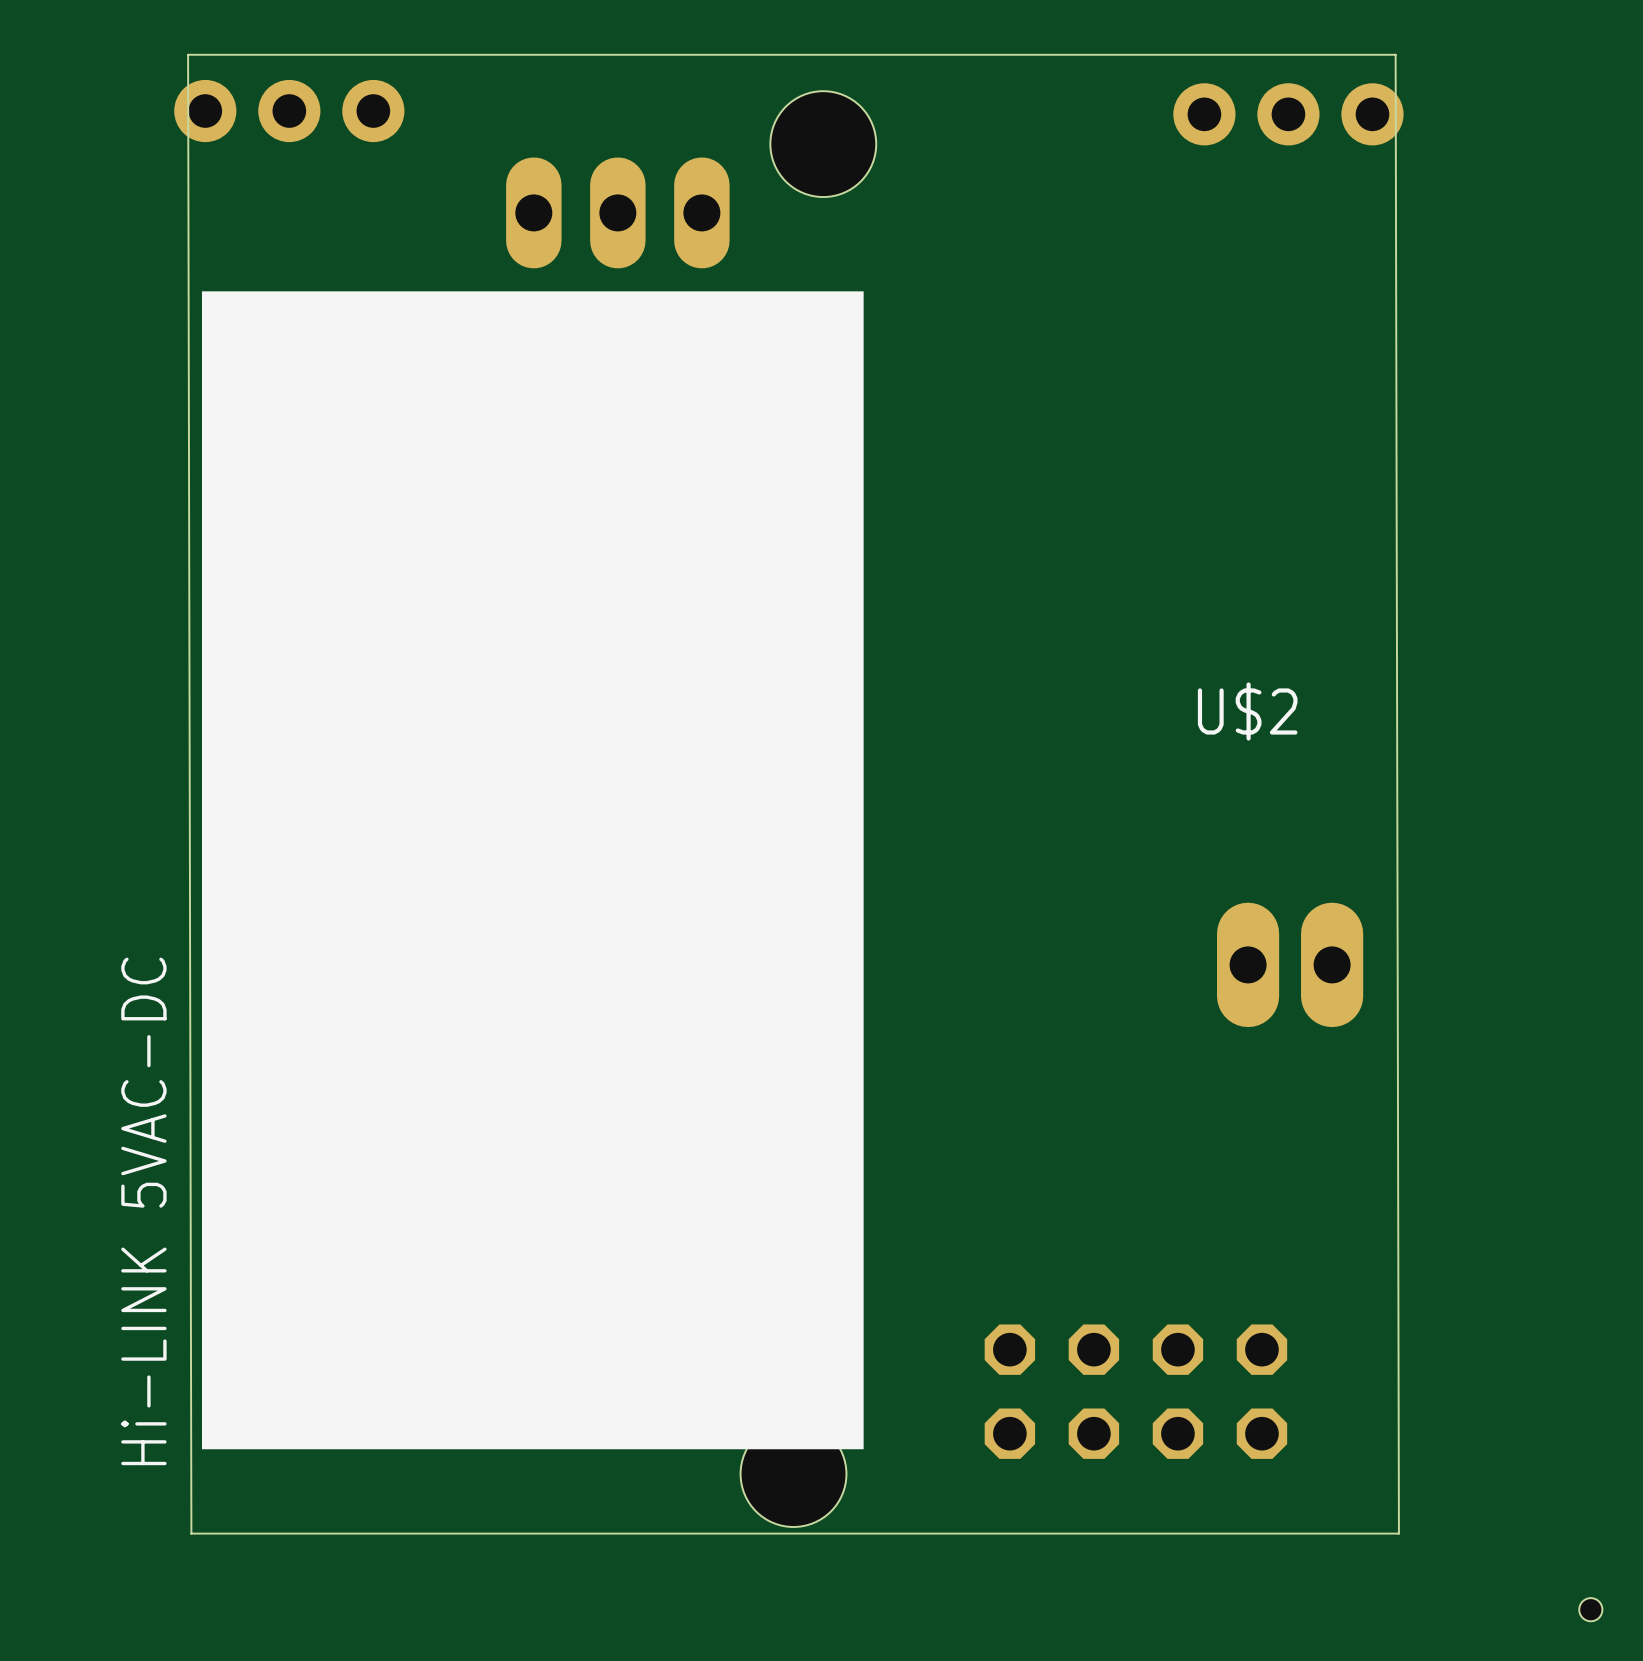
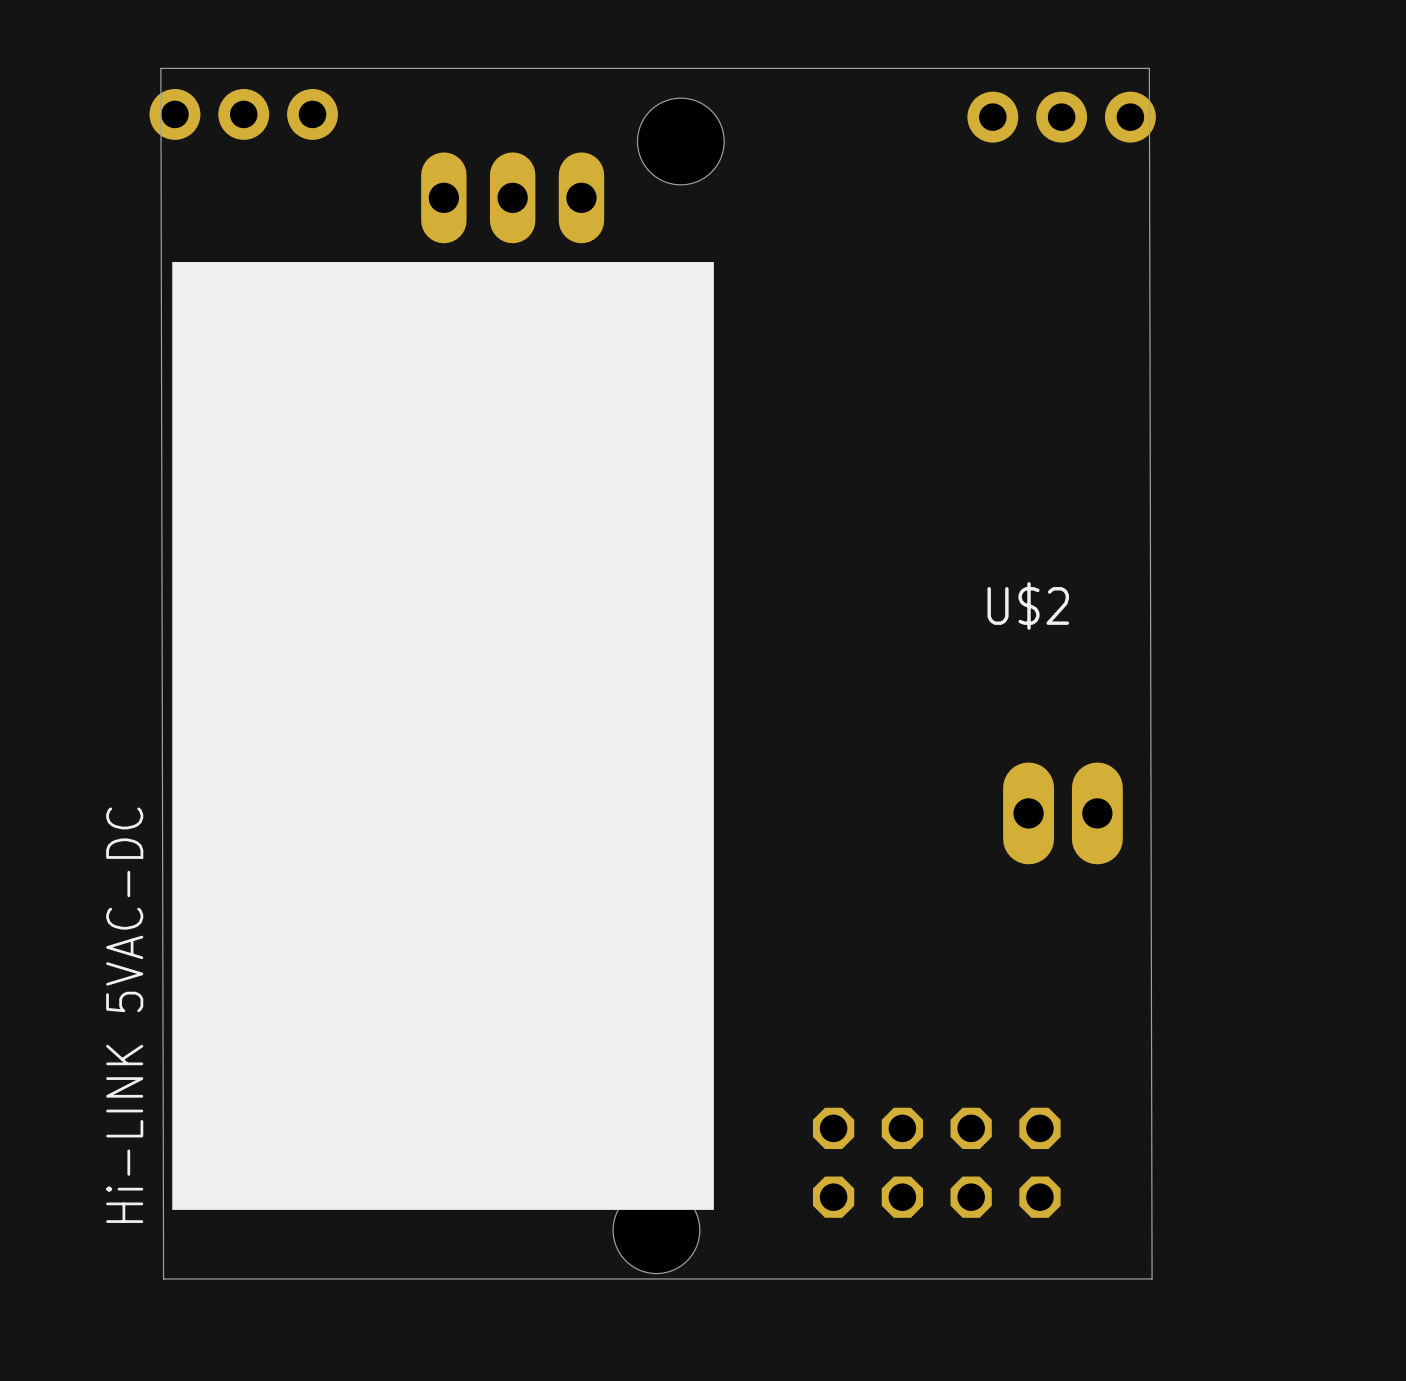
hole: (1590, 1609) -> none

